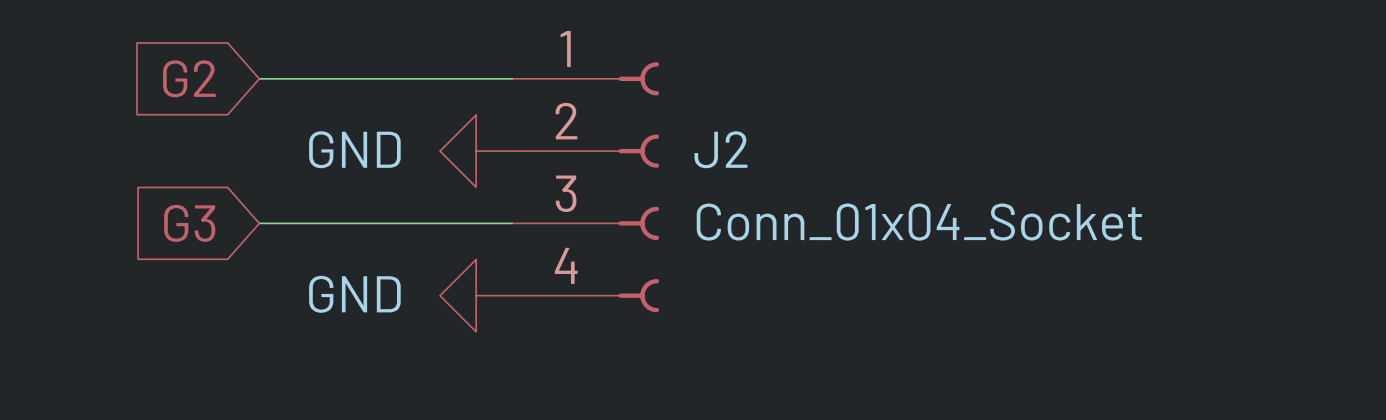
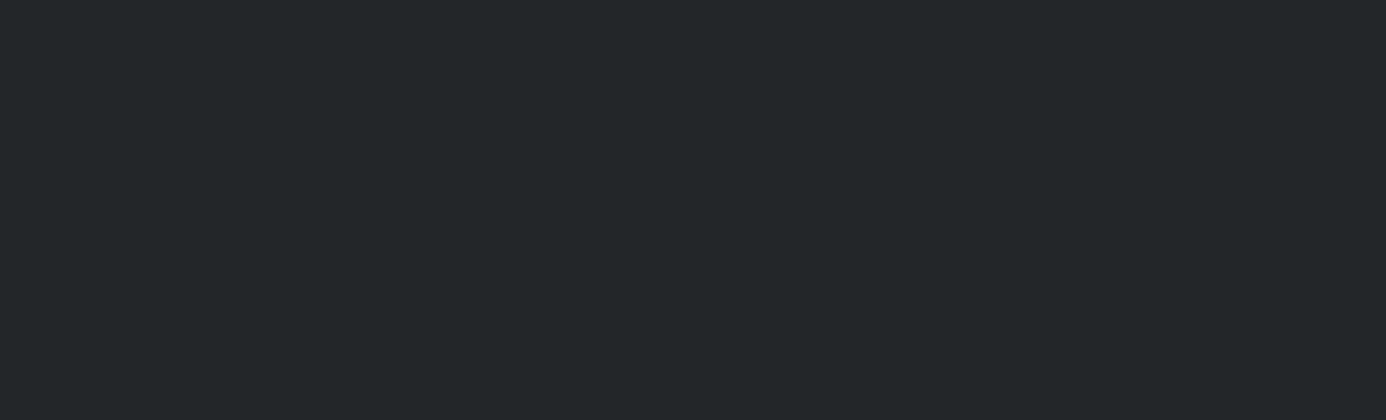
global label: G2 (189, 78) -> none
wire: (259, 78) (512, 78) -> none
power symbol: GND (476, 151) -> none
J2: Conn_01x04_Socket (585, 187) -> none
global label: G3 (189, 223) -> none
wire: (259, 223) (512, 223) -> none
power symbol: GND (476, 295) -> none

